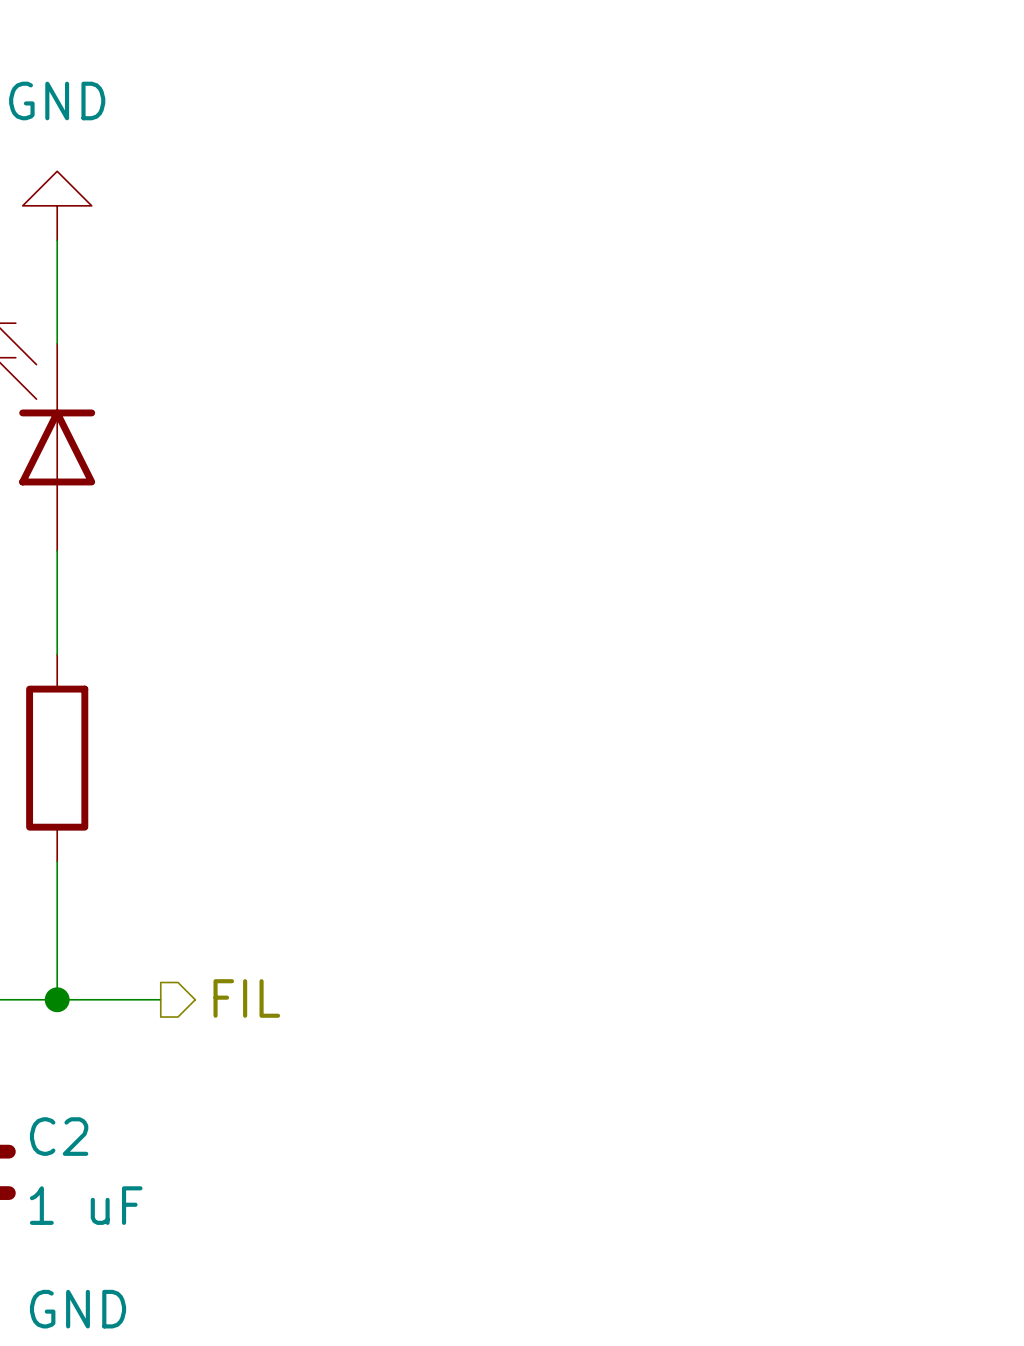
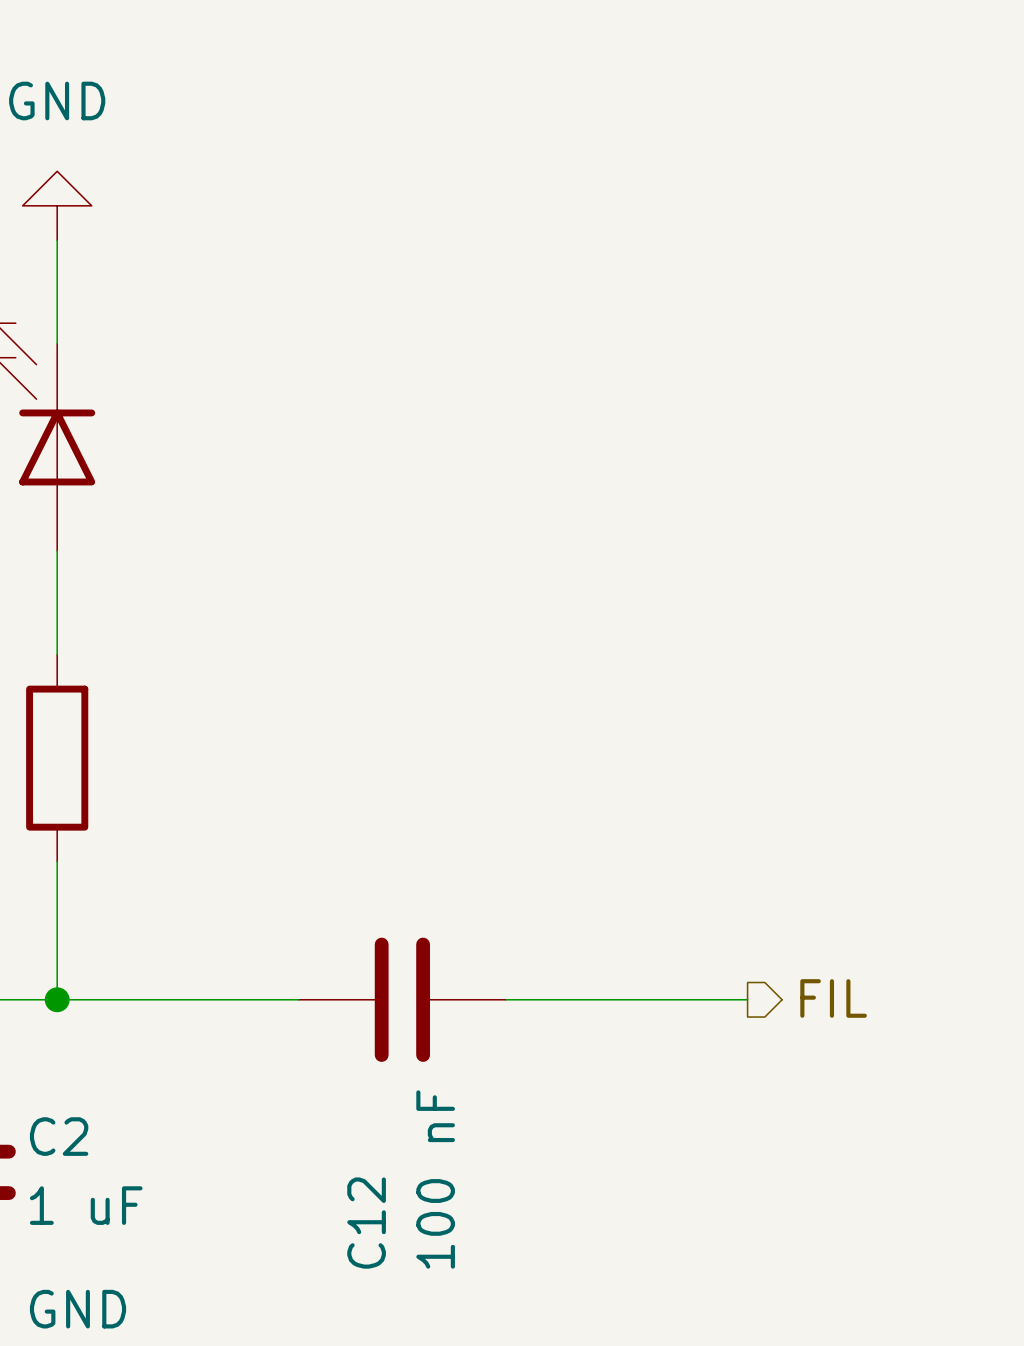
hierarchical label position: FIL (246, 998) -> FIL (833, 998)
wire: none -> (160, 999) (298, 999)
C12: none -> 100 nF (402, 999)
wire: none -> (505, 999) (747, 999)

